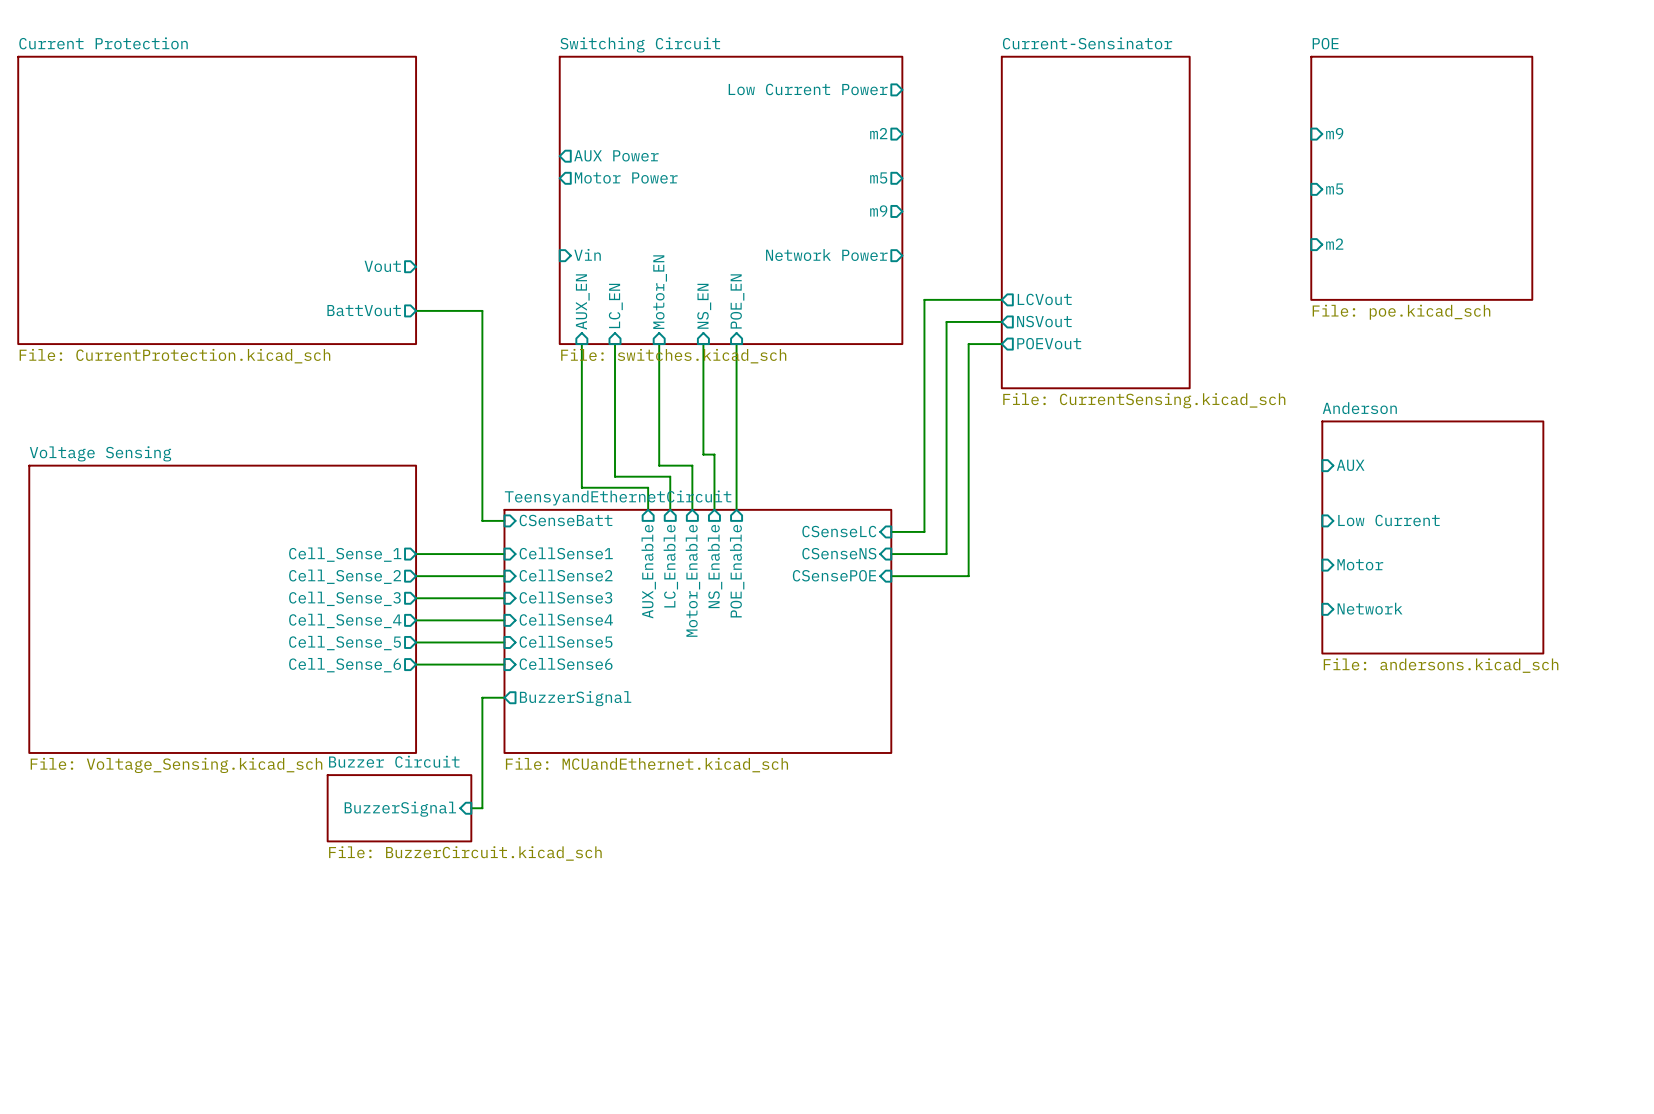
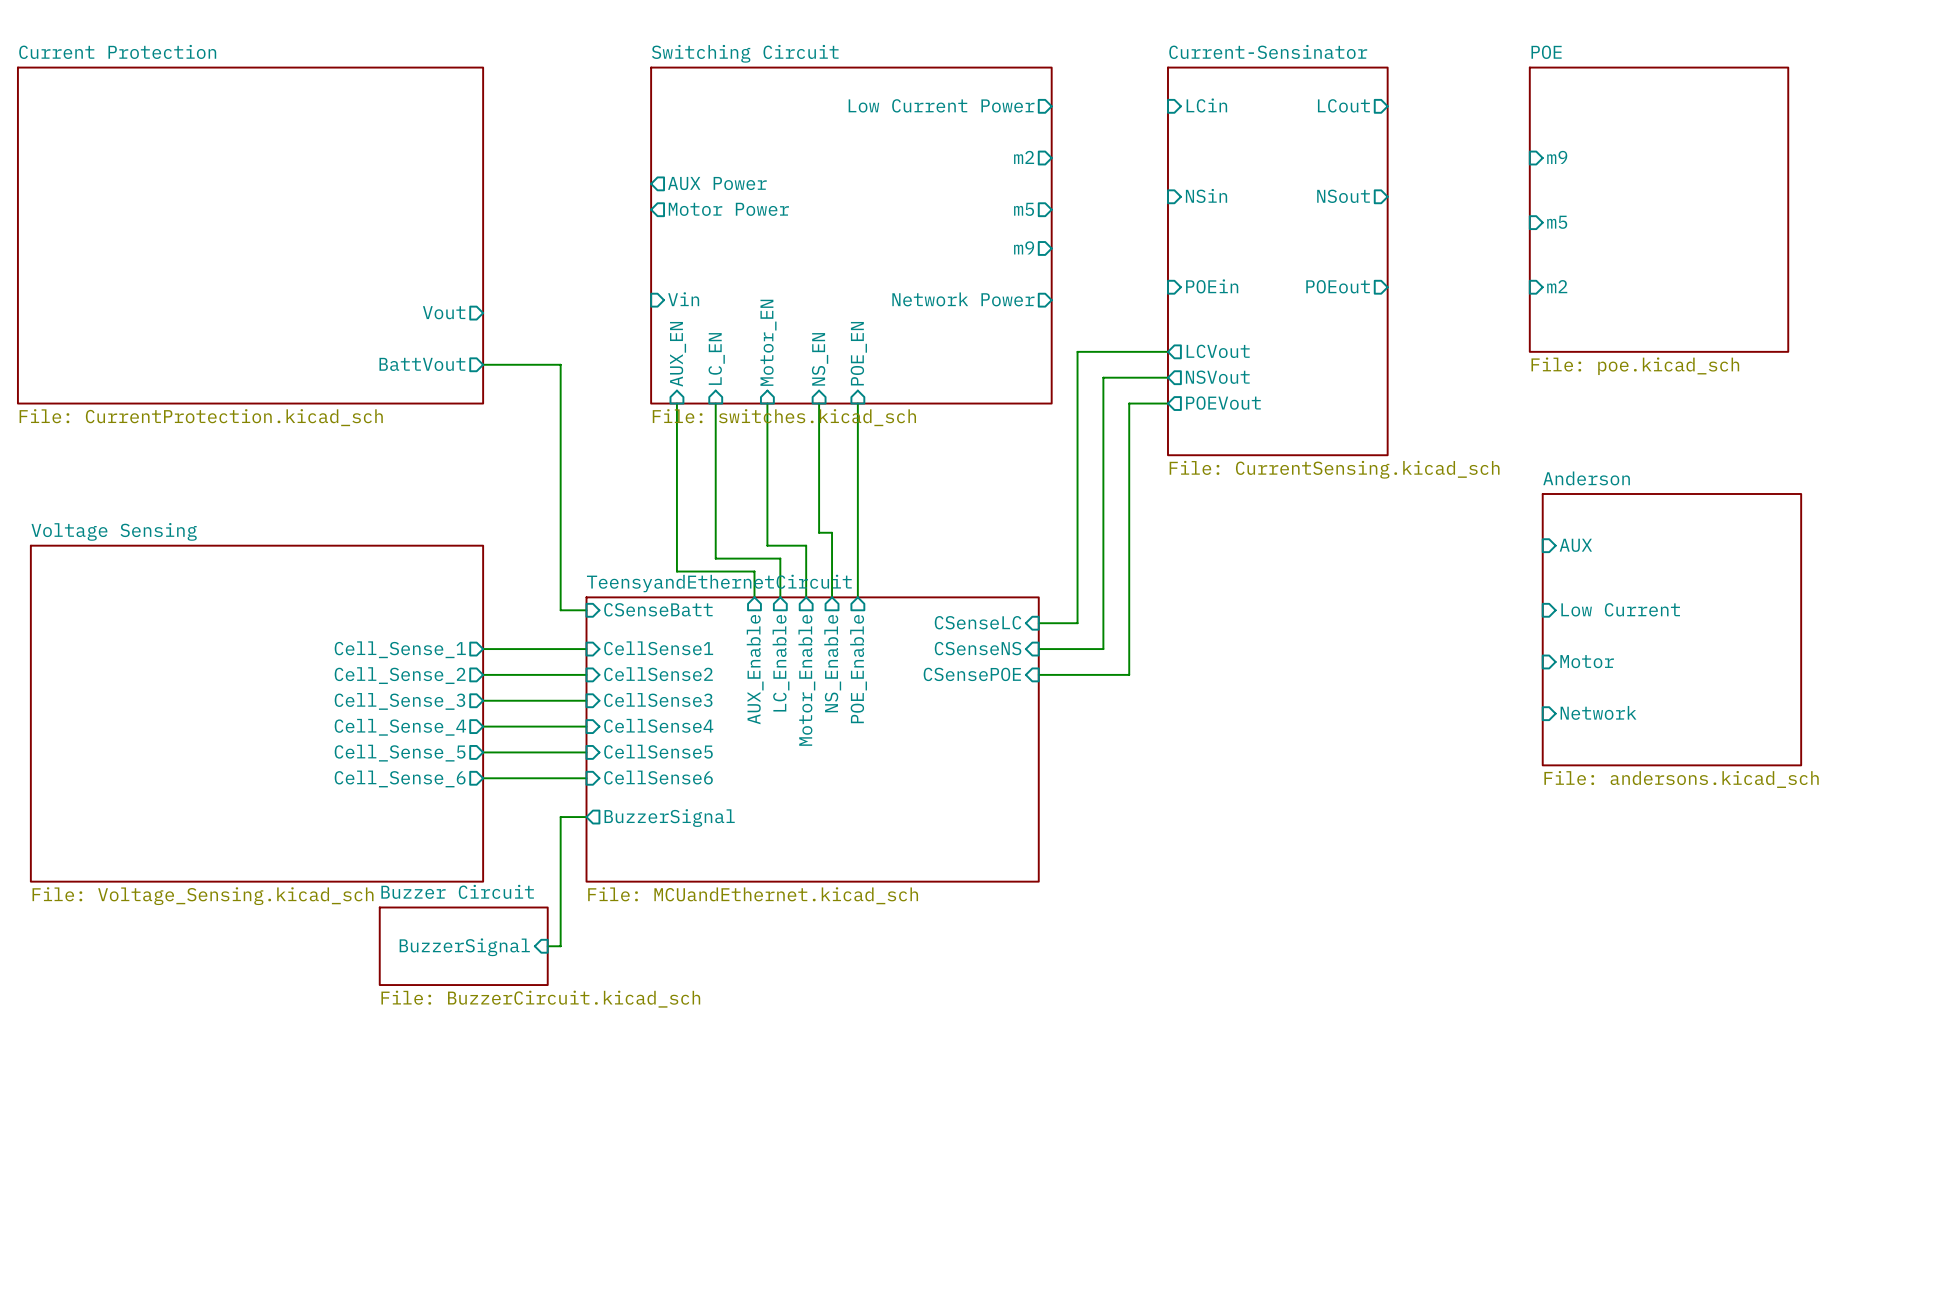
sheet pin: none -> LCin (1206, 105)
sheet pin: none -> LCout (1343, 105)
sheet pin: none -> NSin (1206, 195)
sheet pin: none -> NSout (1343, 196)
sheet pin: none -> POEin (1212, 286)
sheet pin: none -> POEout (1338, 286)

